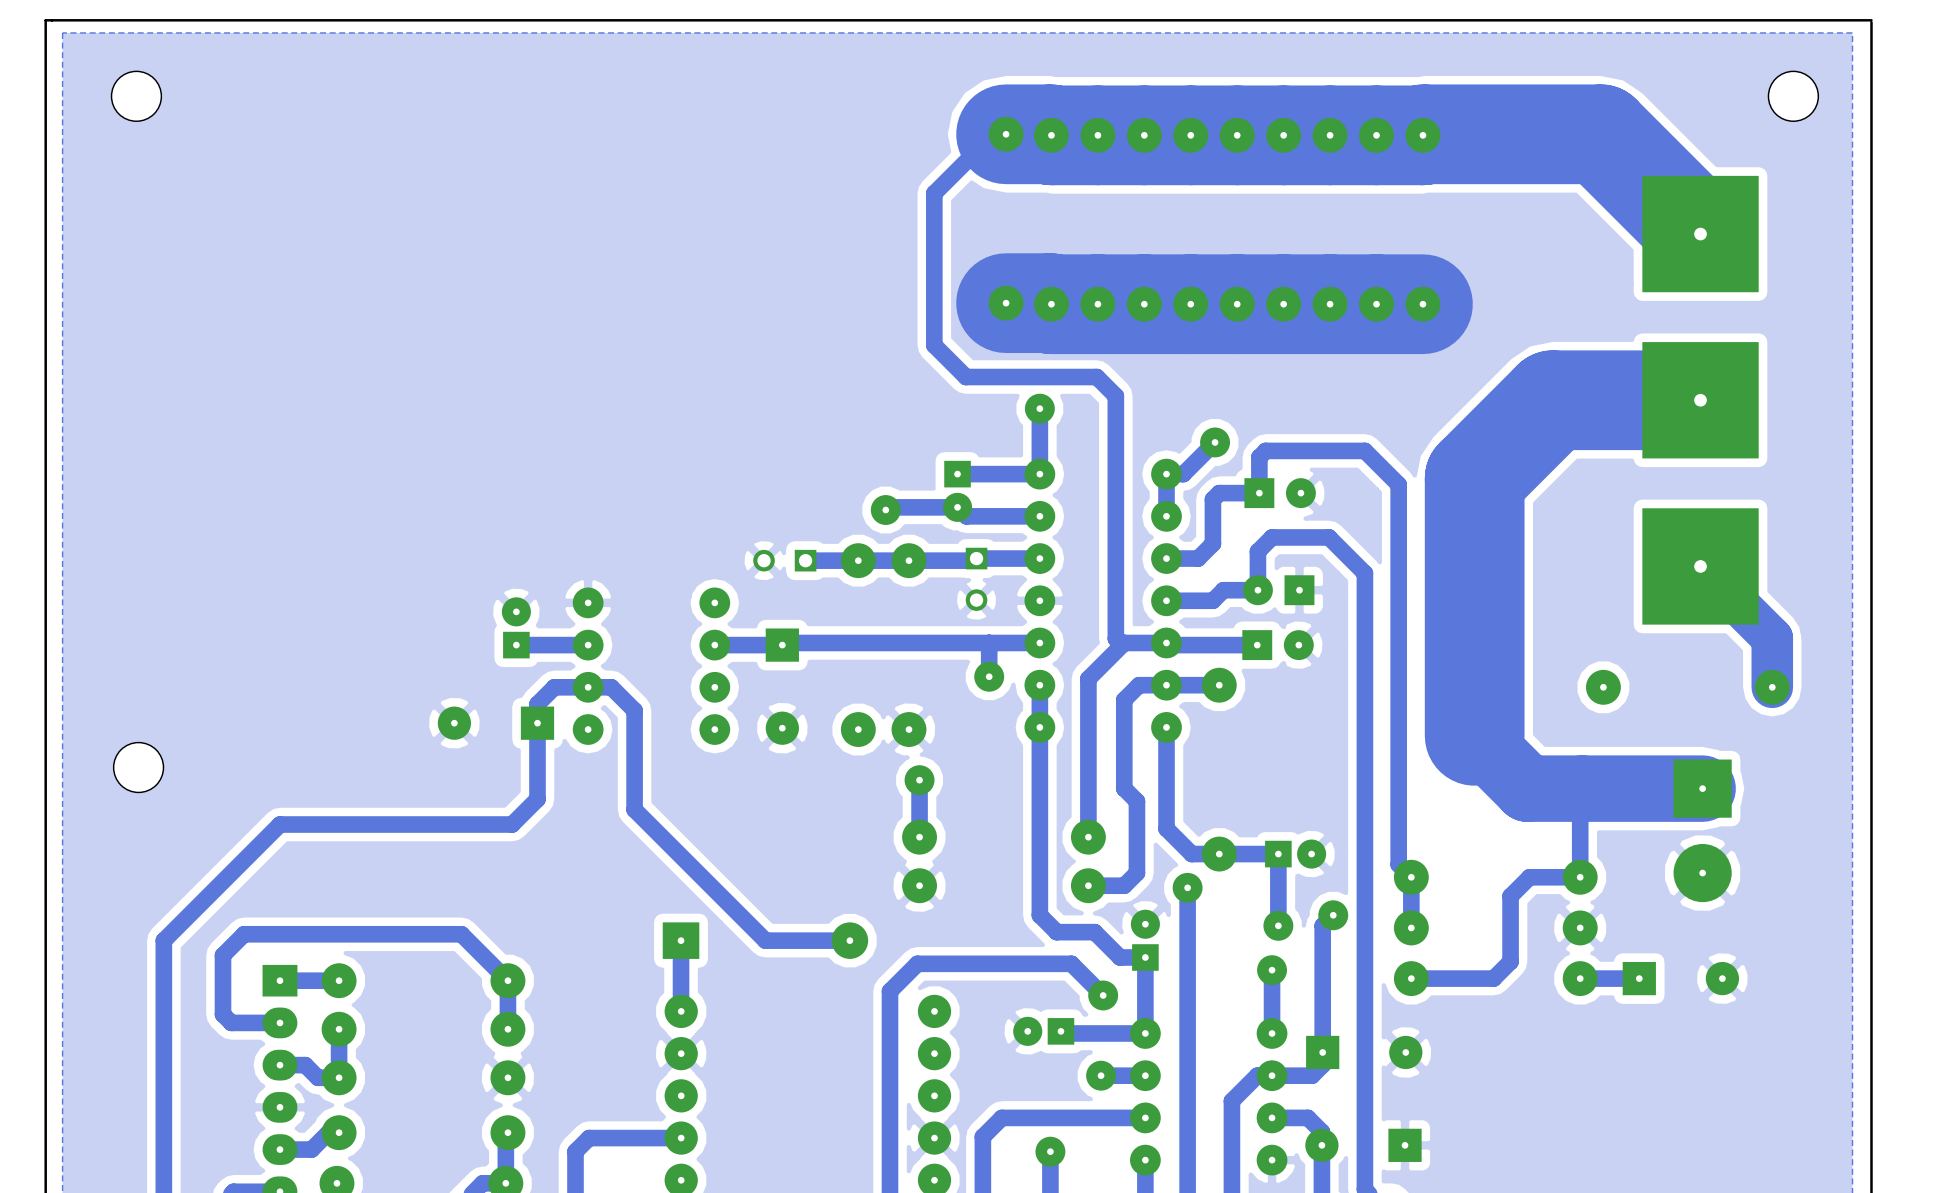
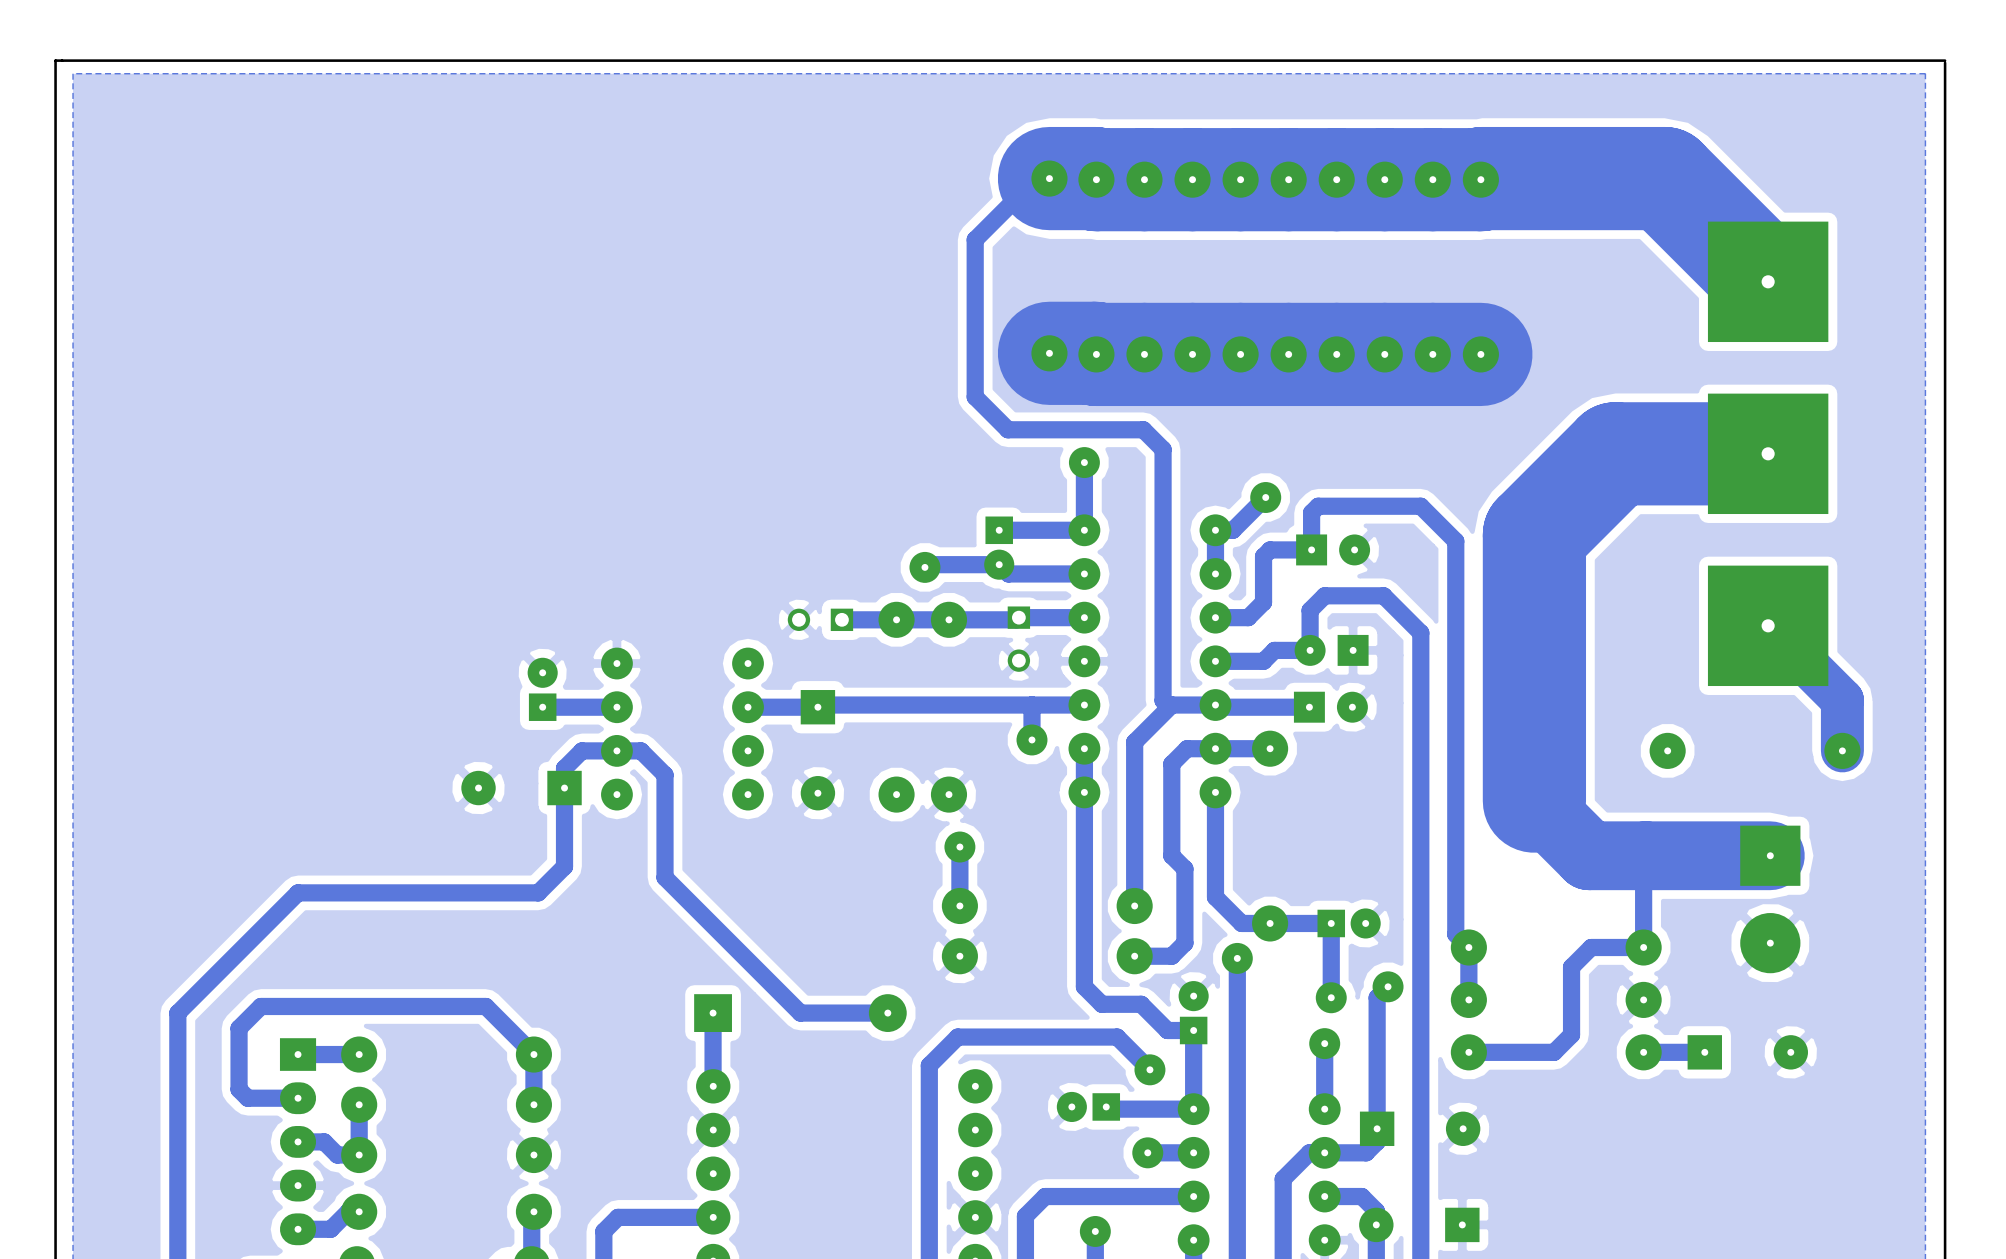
part: (136, 96) -> none
part: (1793, 96) -> none
part: (138, 767) -> none

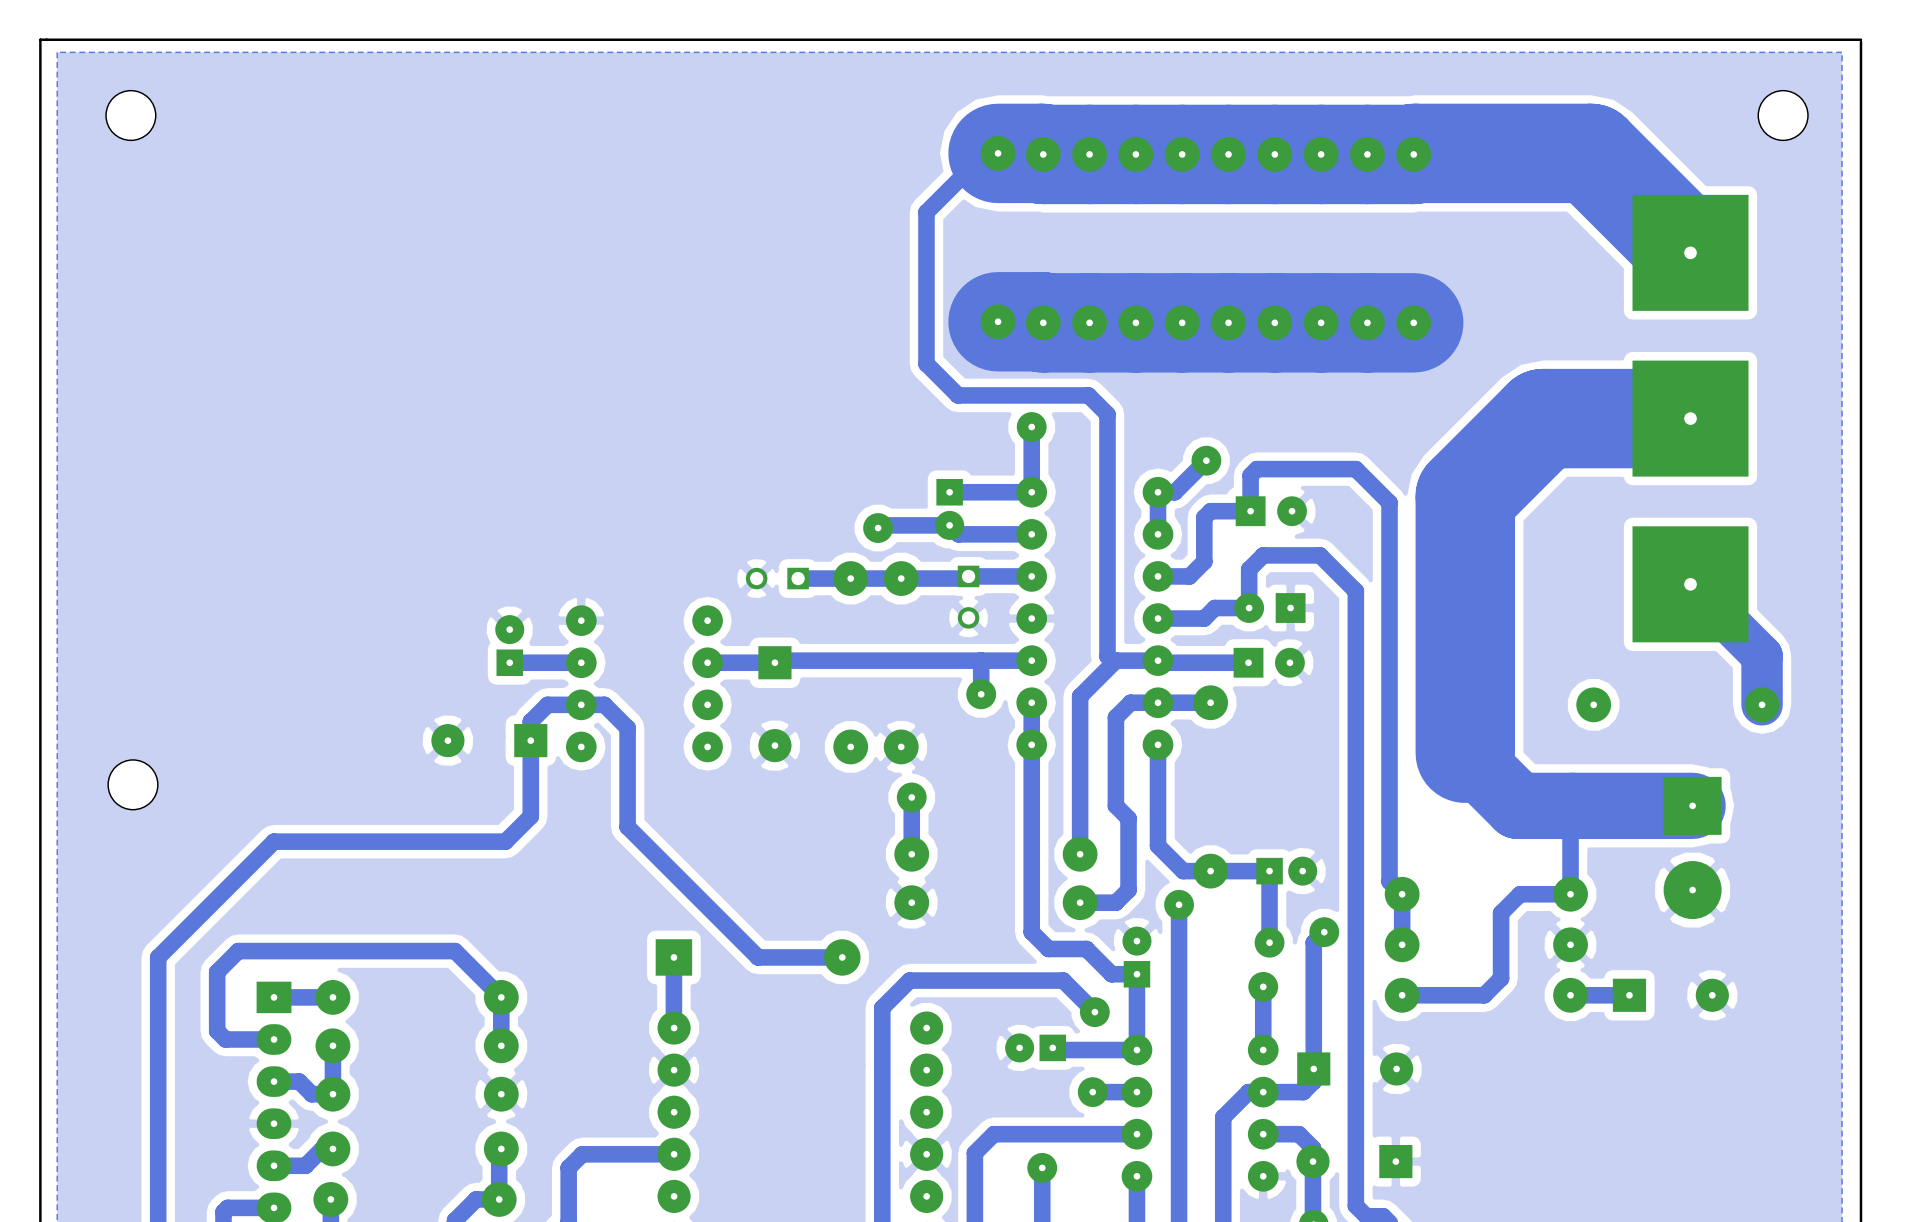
part: none -> (130, 115)
part: none -> (1783, 115)
part: none -> (132, 784)

